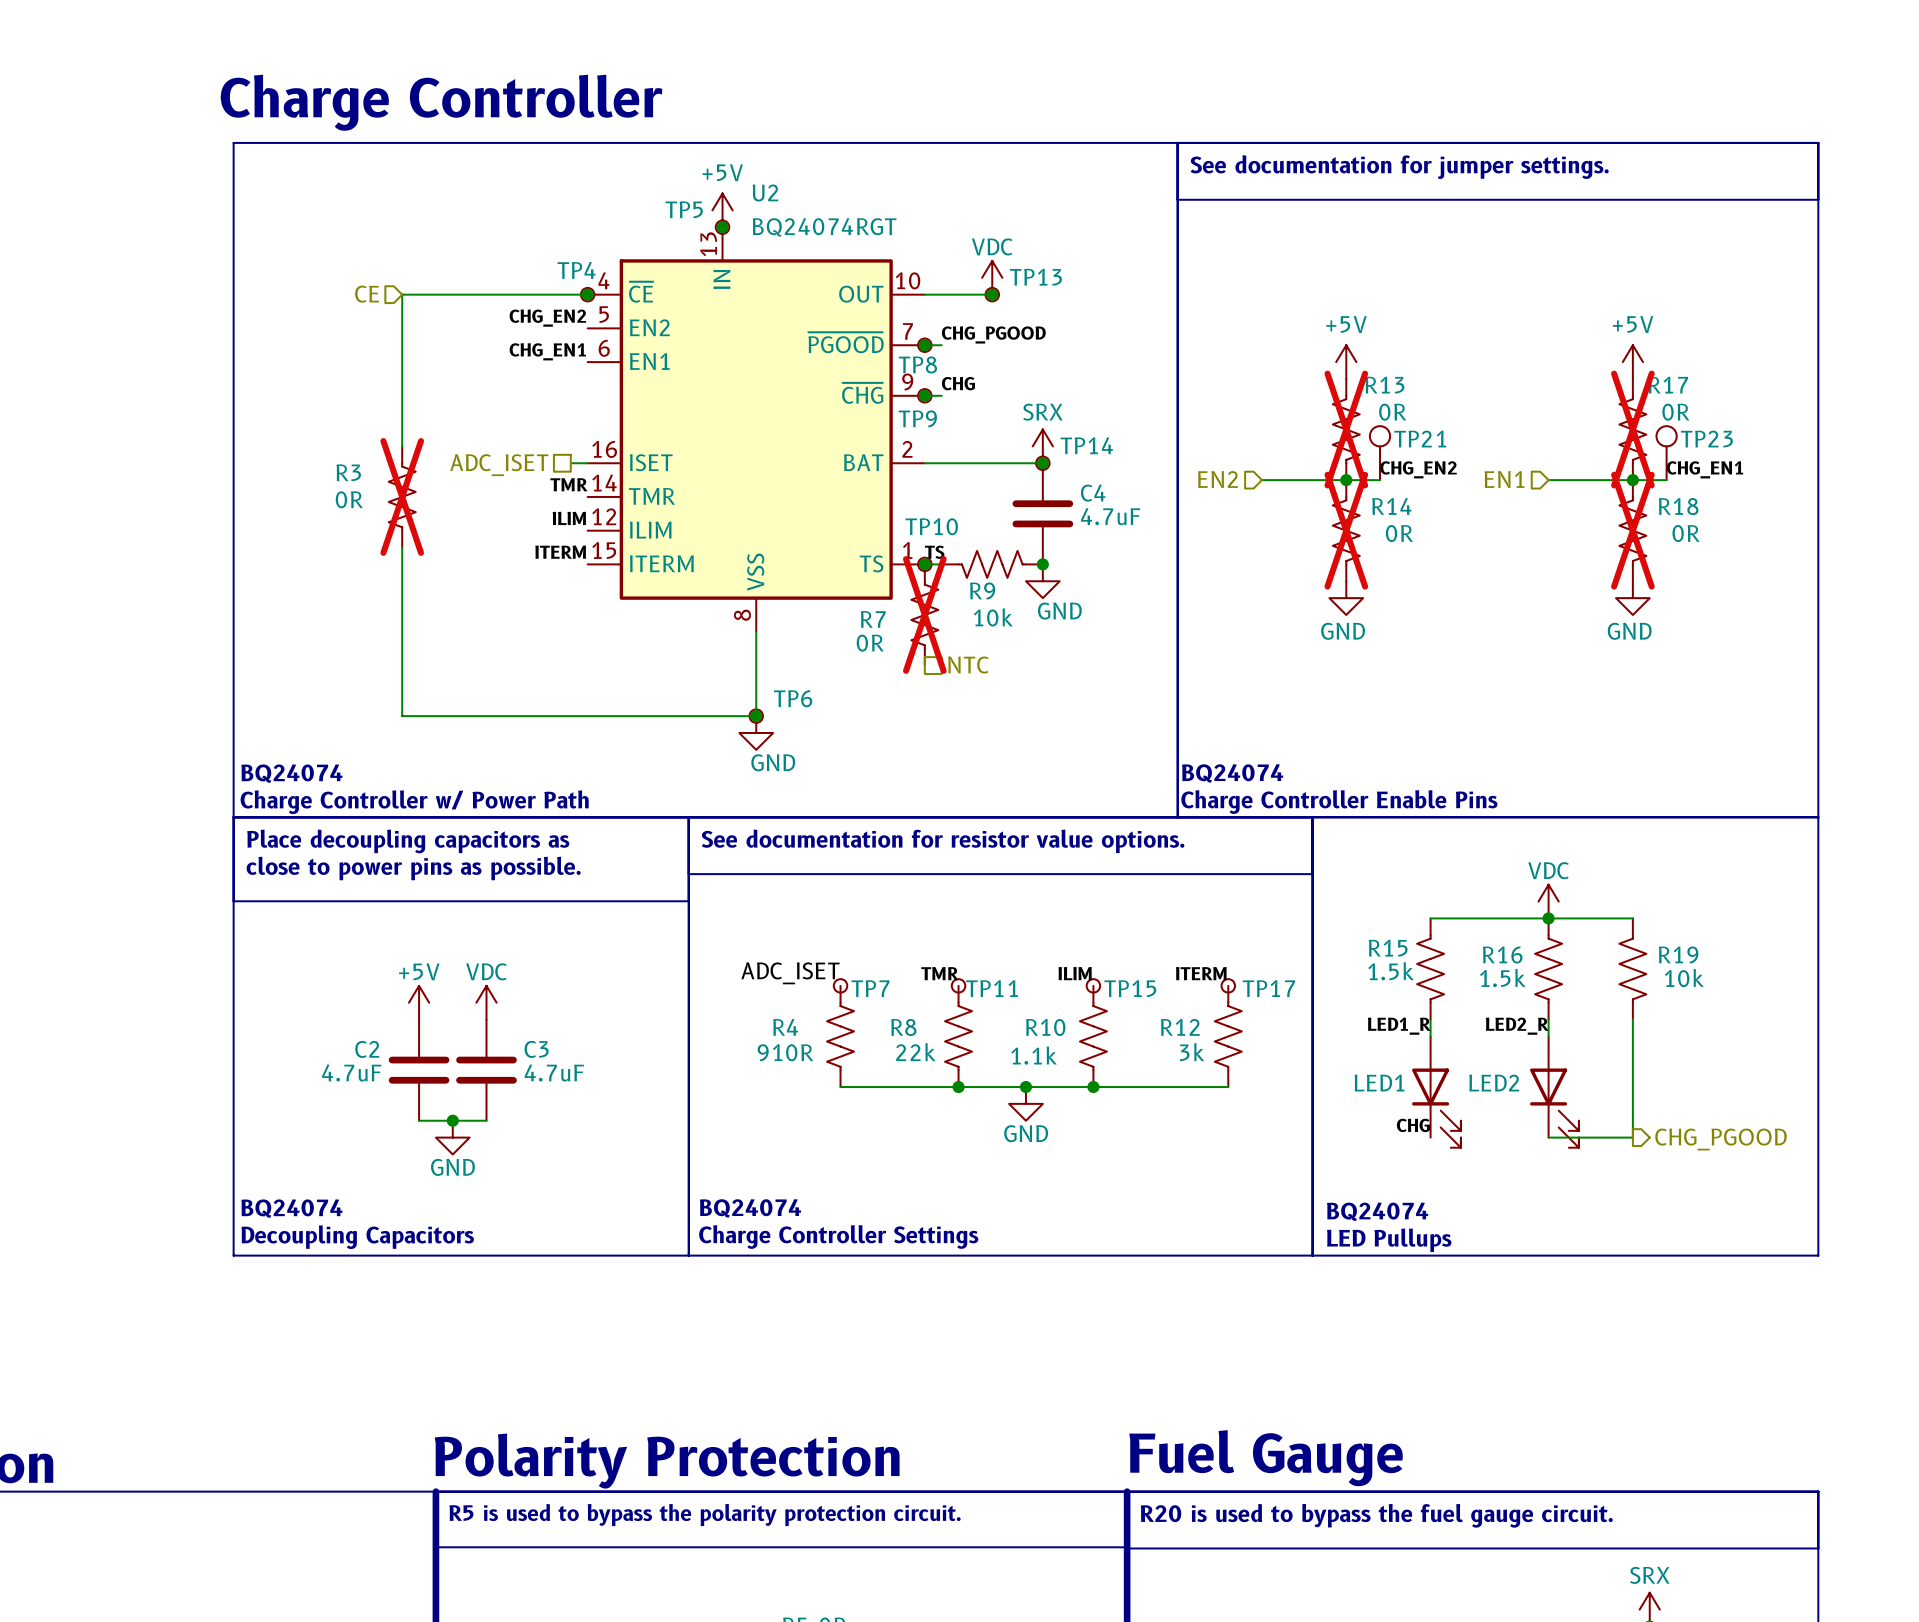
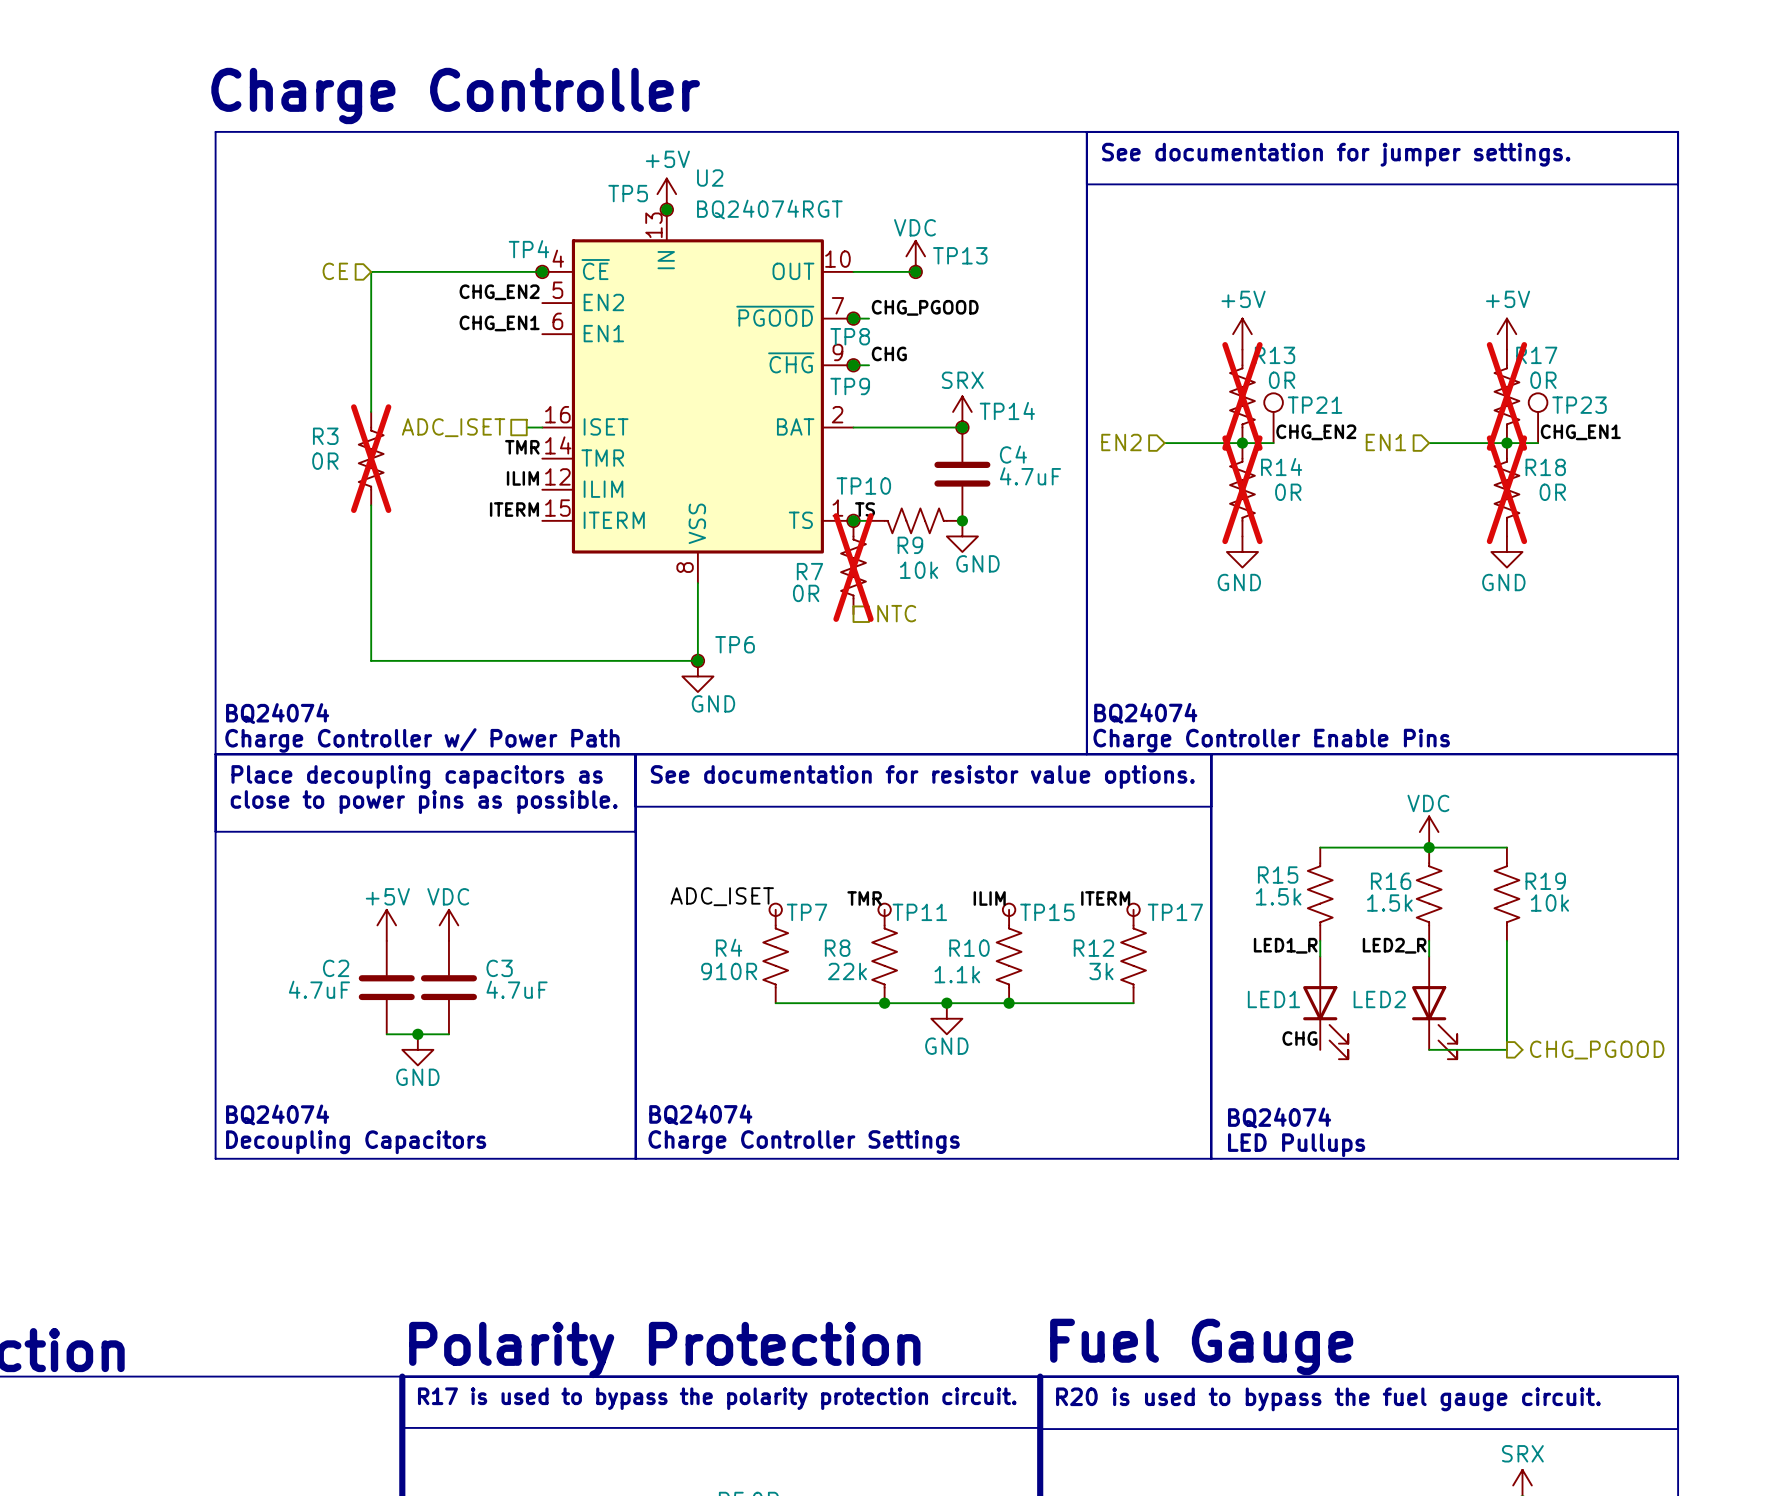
text: R5 is used to bypass the polarity protection circuit. (705, 1514) -> R17 is used to bypass the polarity protection circuit. (717, 1398)

